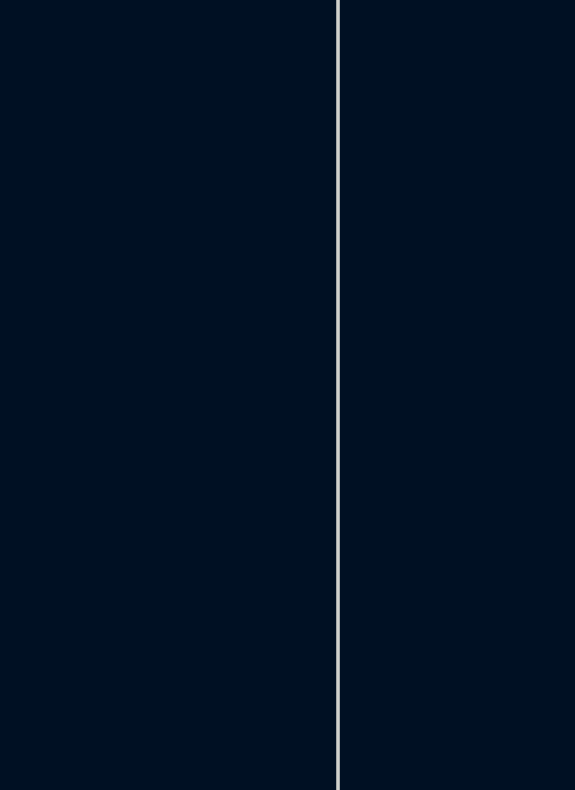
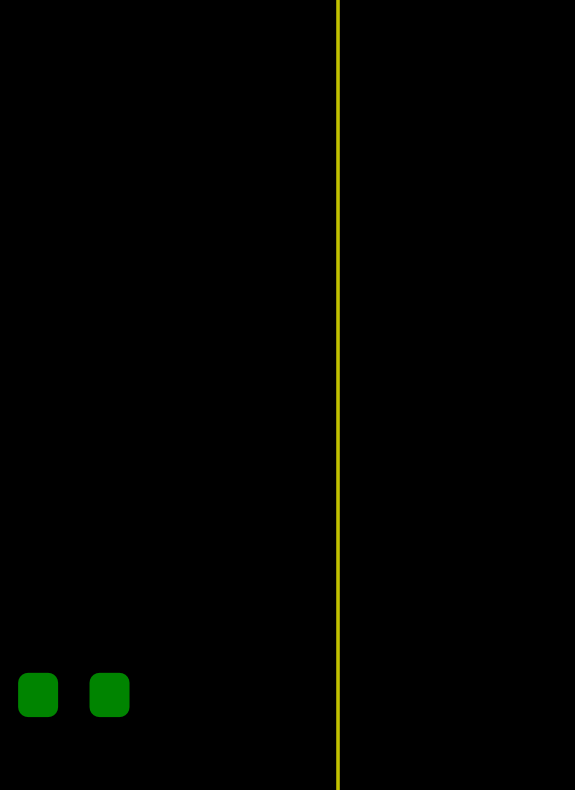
part: none -> (73, 694)

